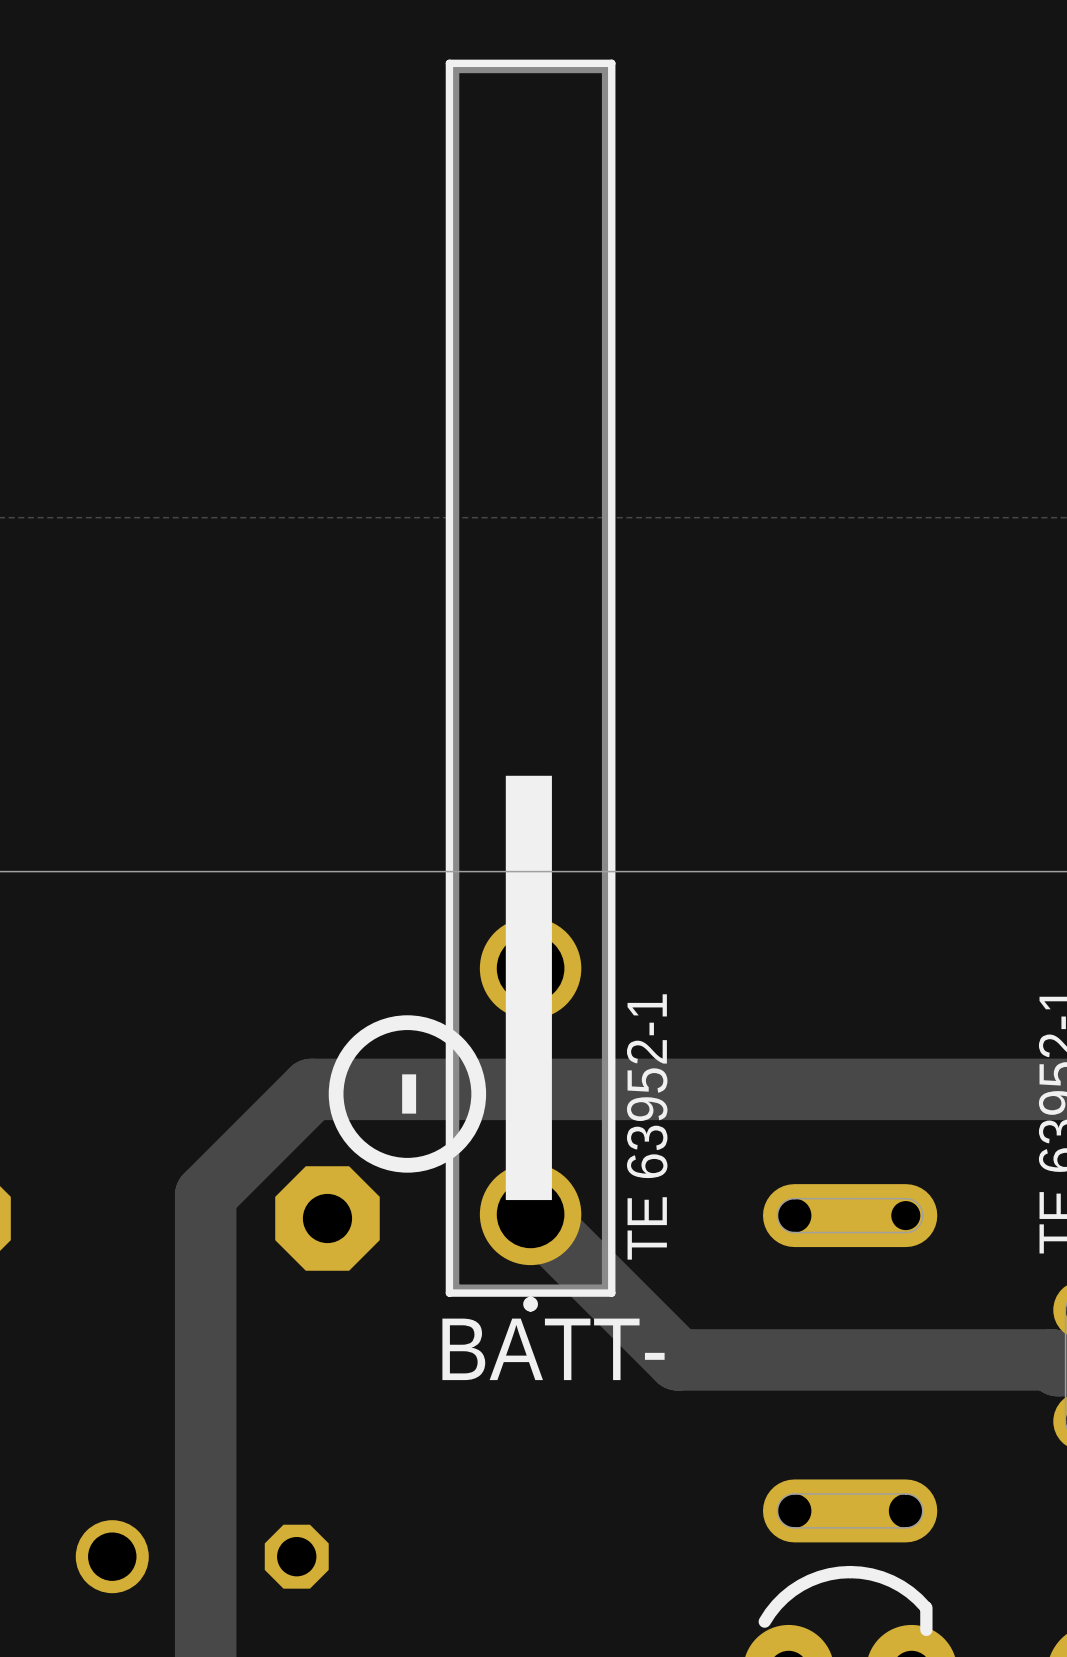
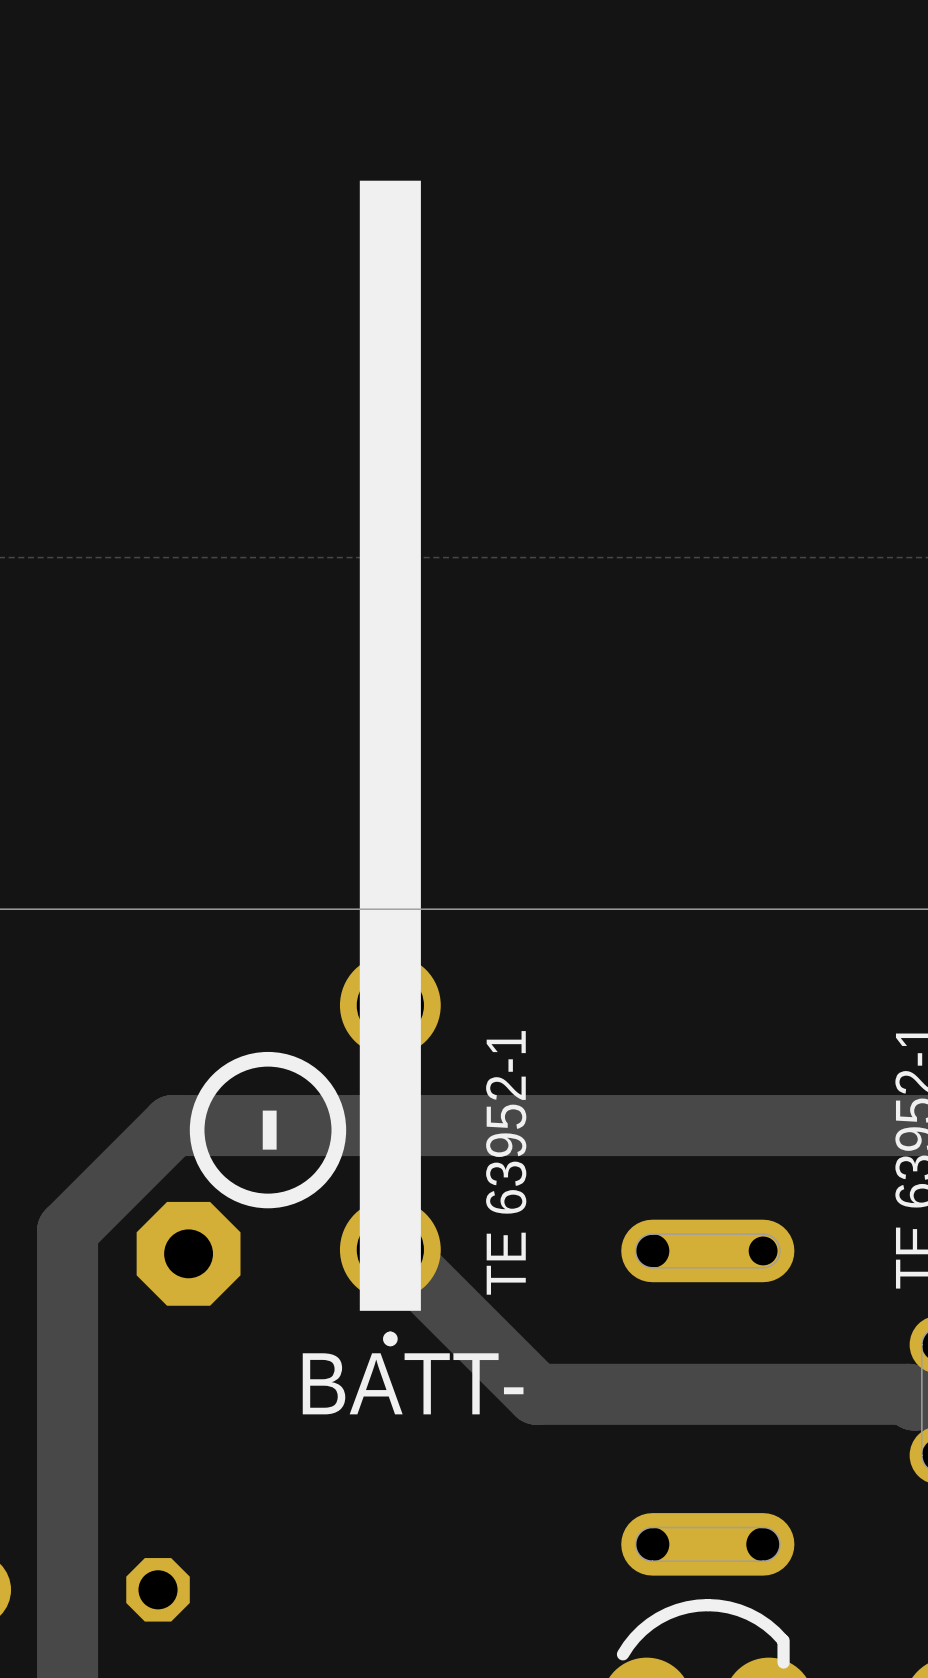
BATT- footprint: [445, 59, 616, 1312] -> [339, 180, 441, 1347]
drawing: [505, 775, 552, 1201] -> none

